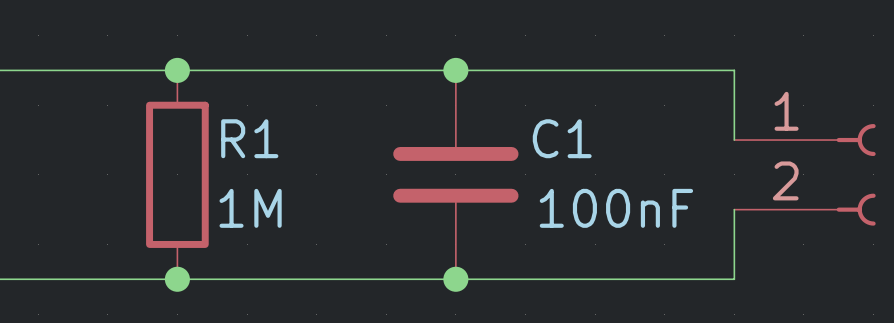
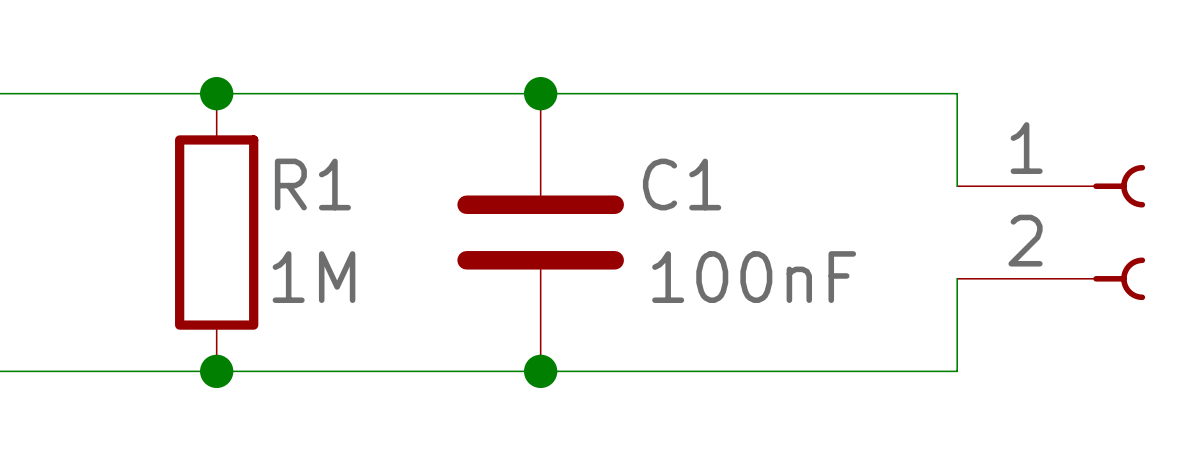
junction position: (455, 70) -> (540, 93)
C1 position: (455, 174) -> (540, 232)
junction position: (455, 279) -> (540, 371)

